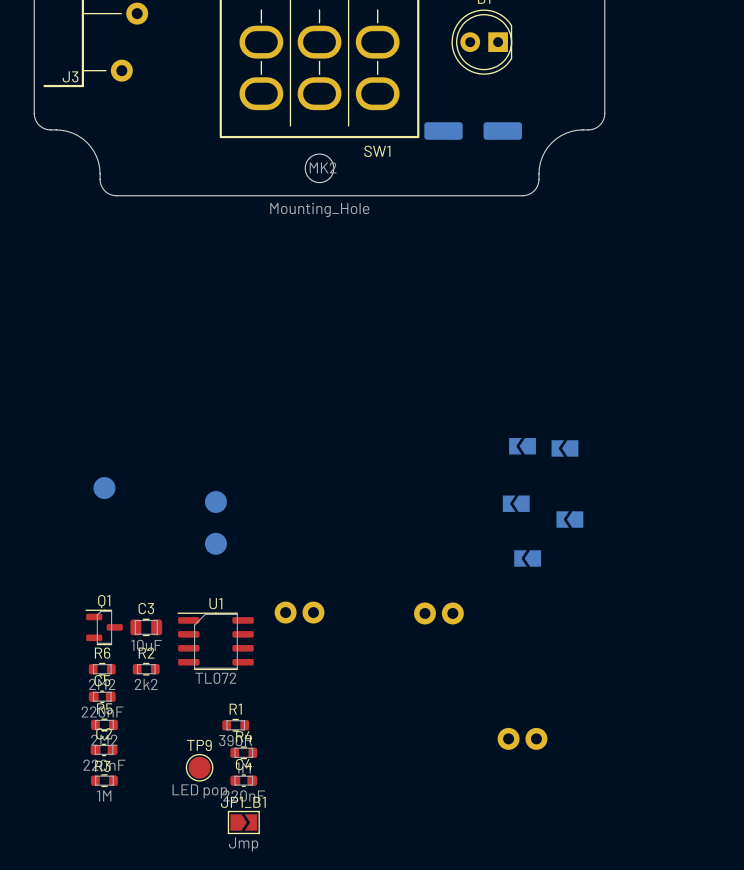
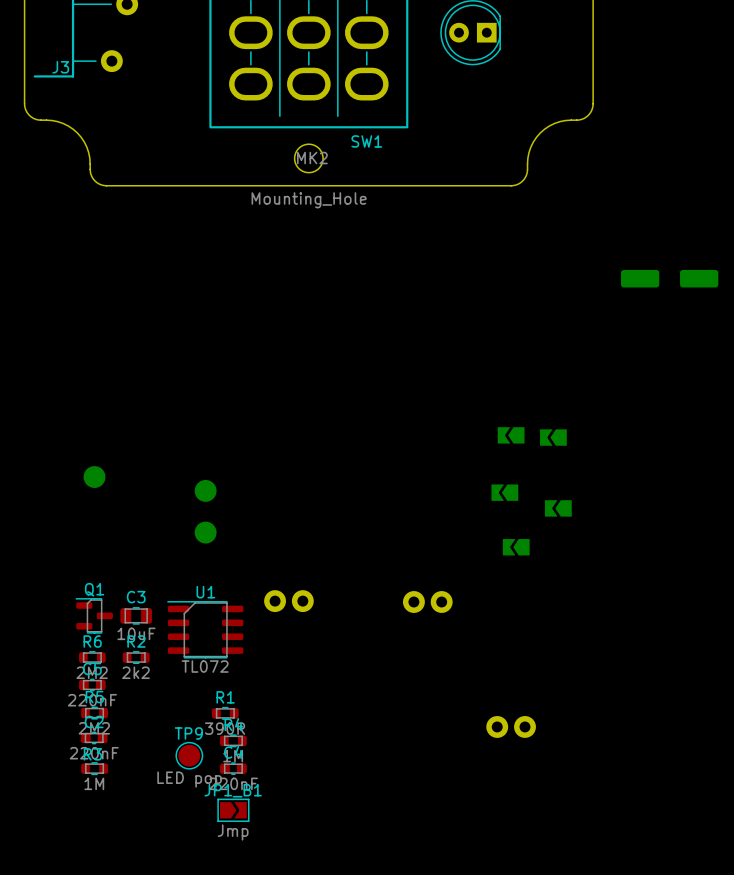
part position: (473, 131) -> (669, 278)

